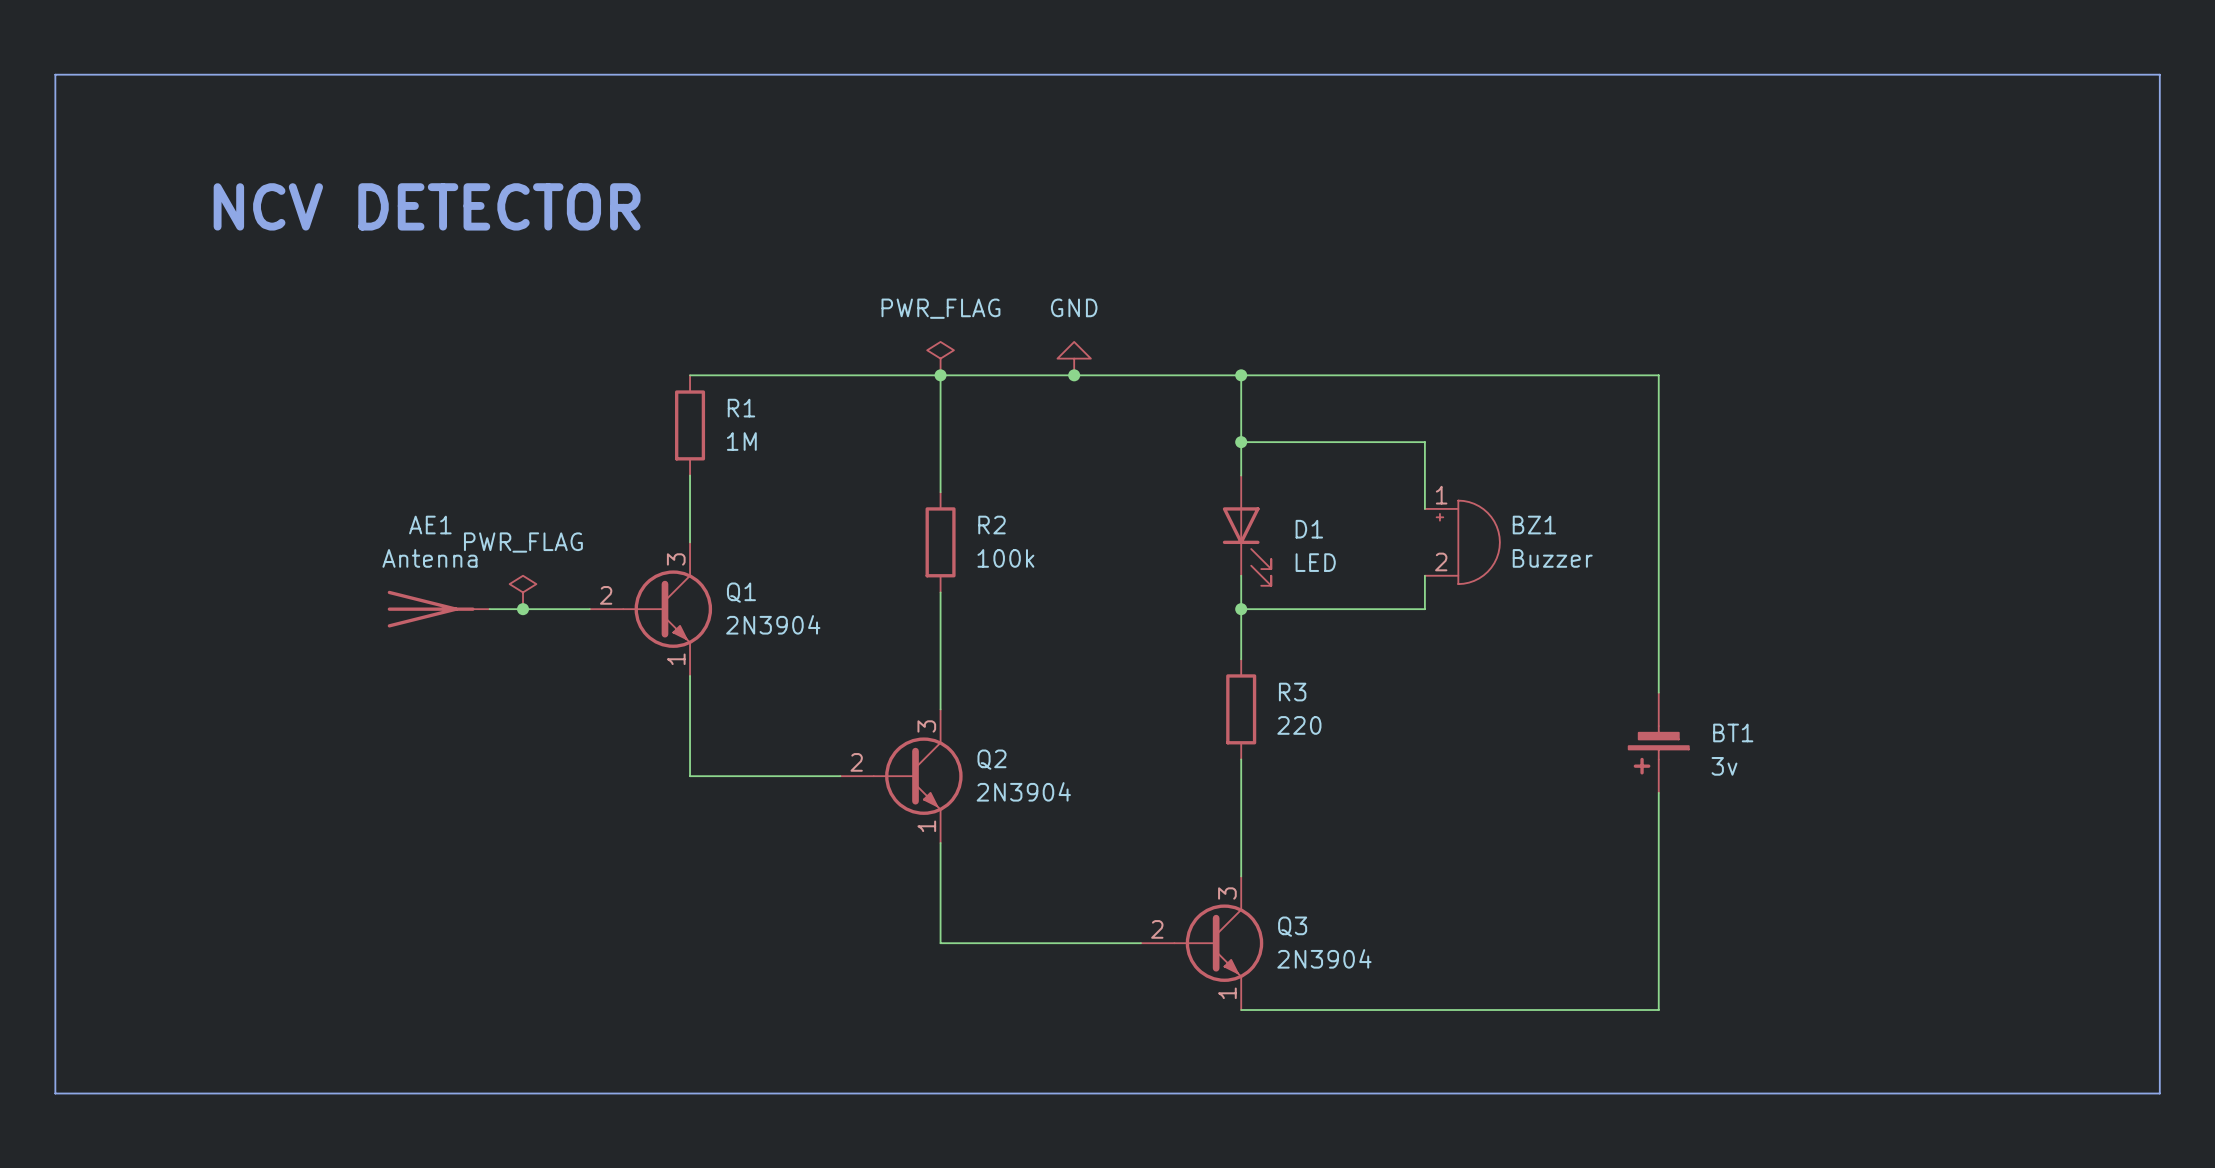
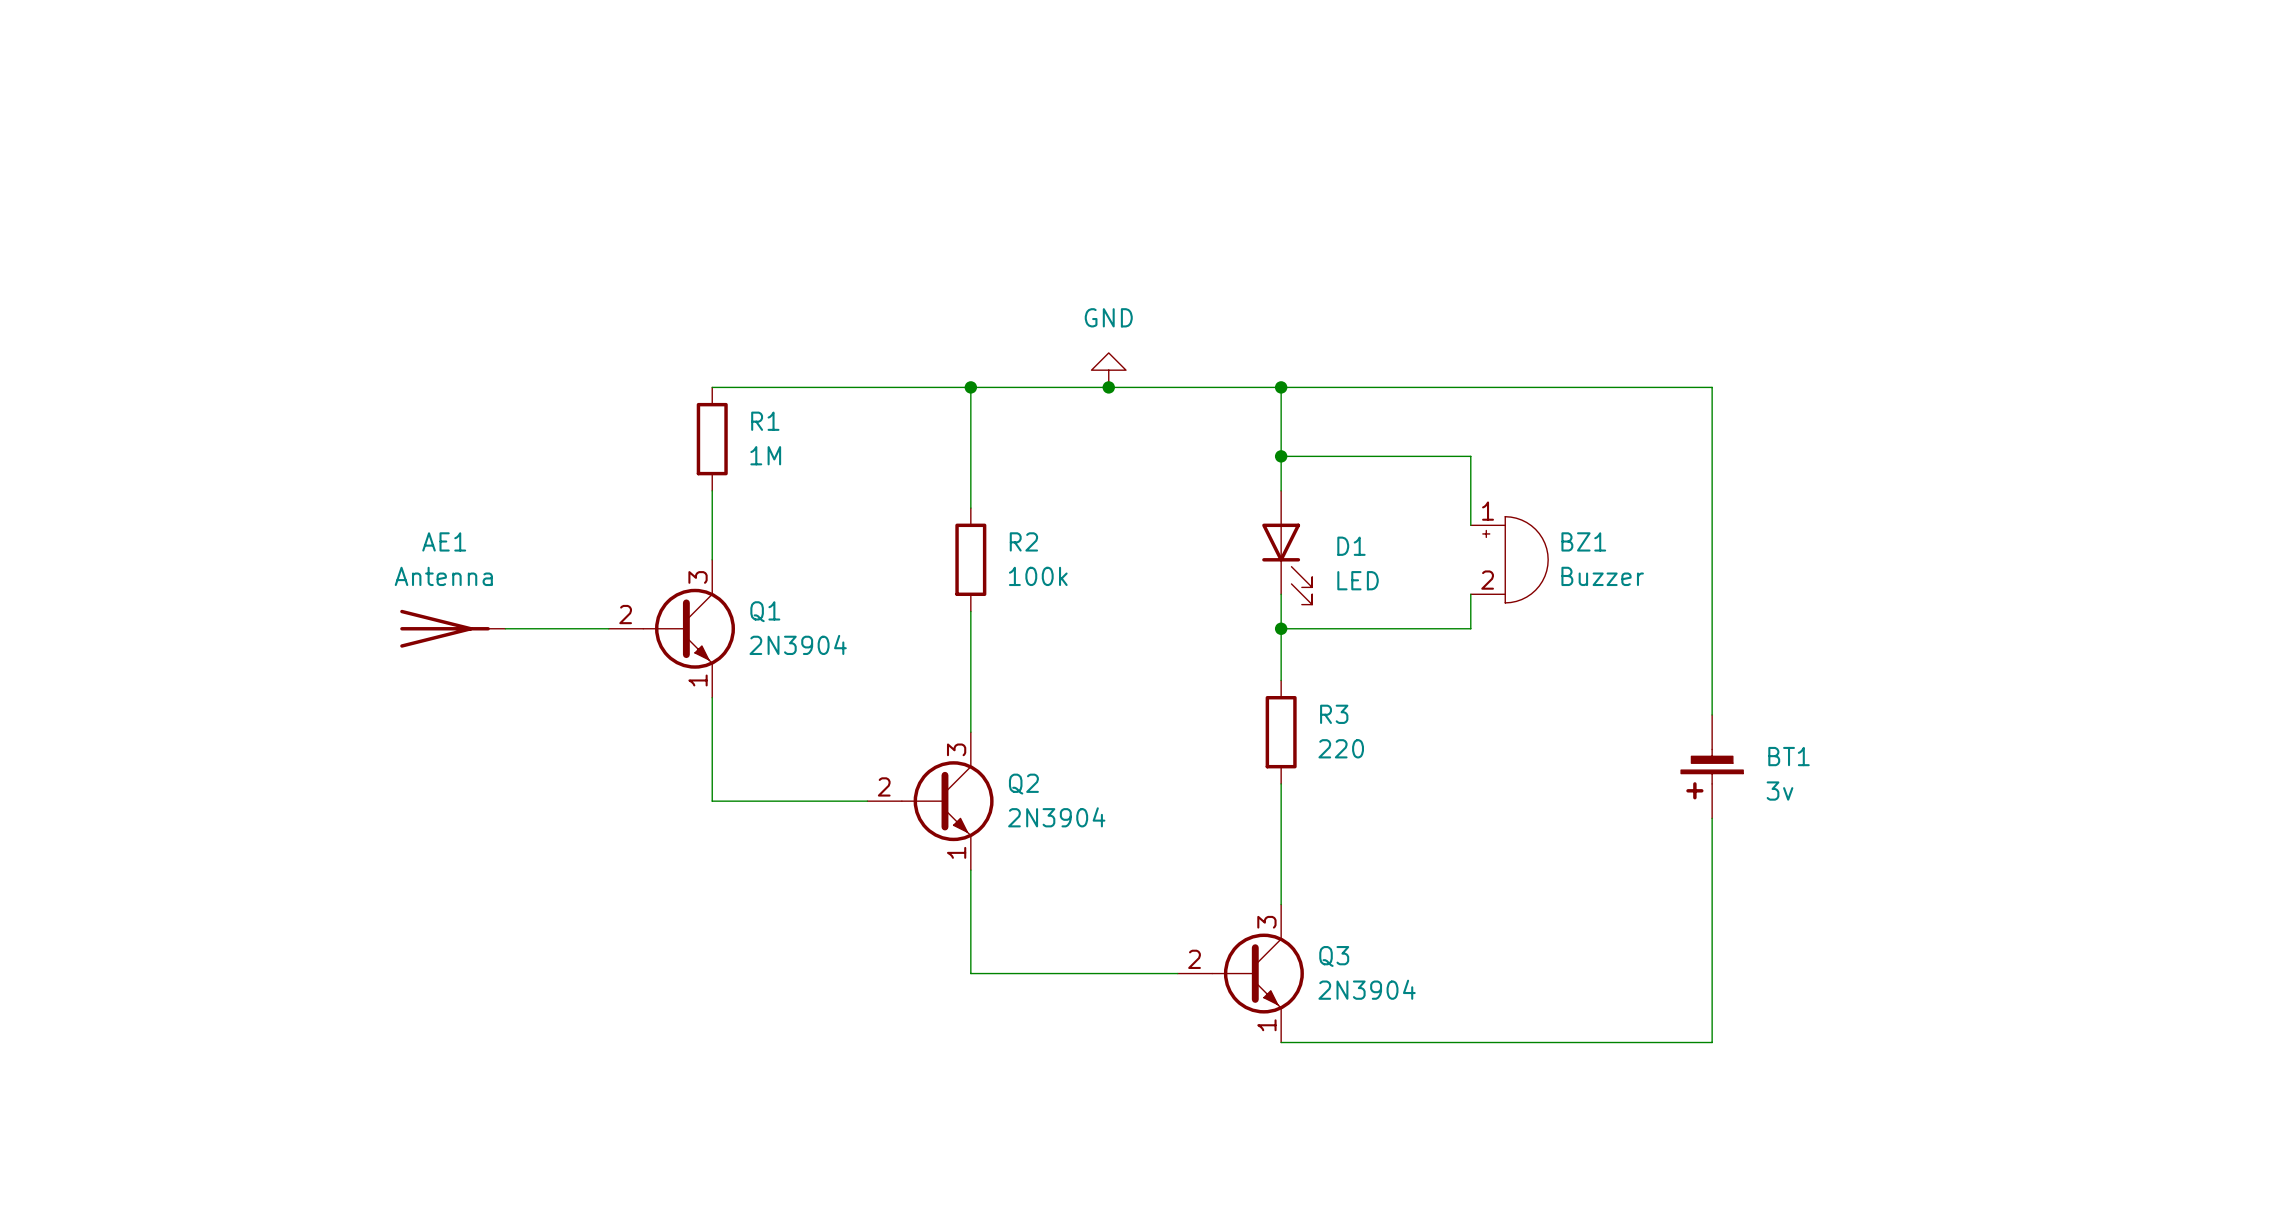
line: (55, 74) (2159, 74) (2159, 1093) (55, 1093) (55, 74) -> none
text: NCV DETECTOR (427, 206) -> none
power symbol: PWR_FLAG (940, 358) -> none
power symbol: PWR_FLAG (523, 592) -> none
junction: (523, 609) -> none

